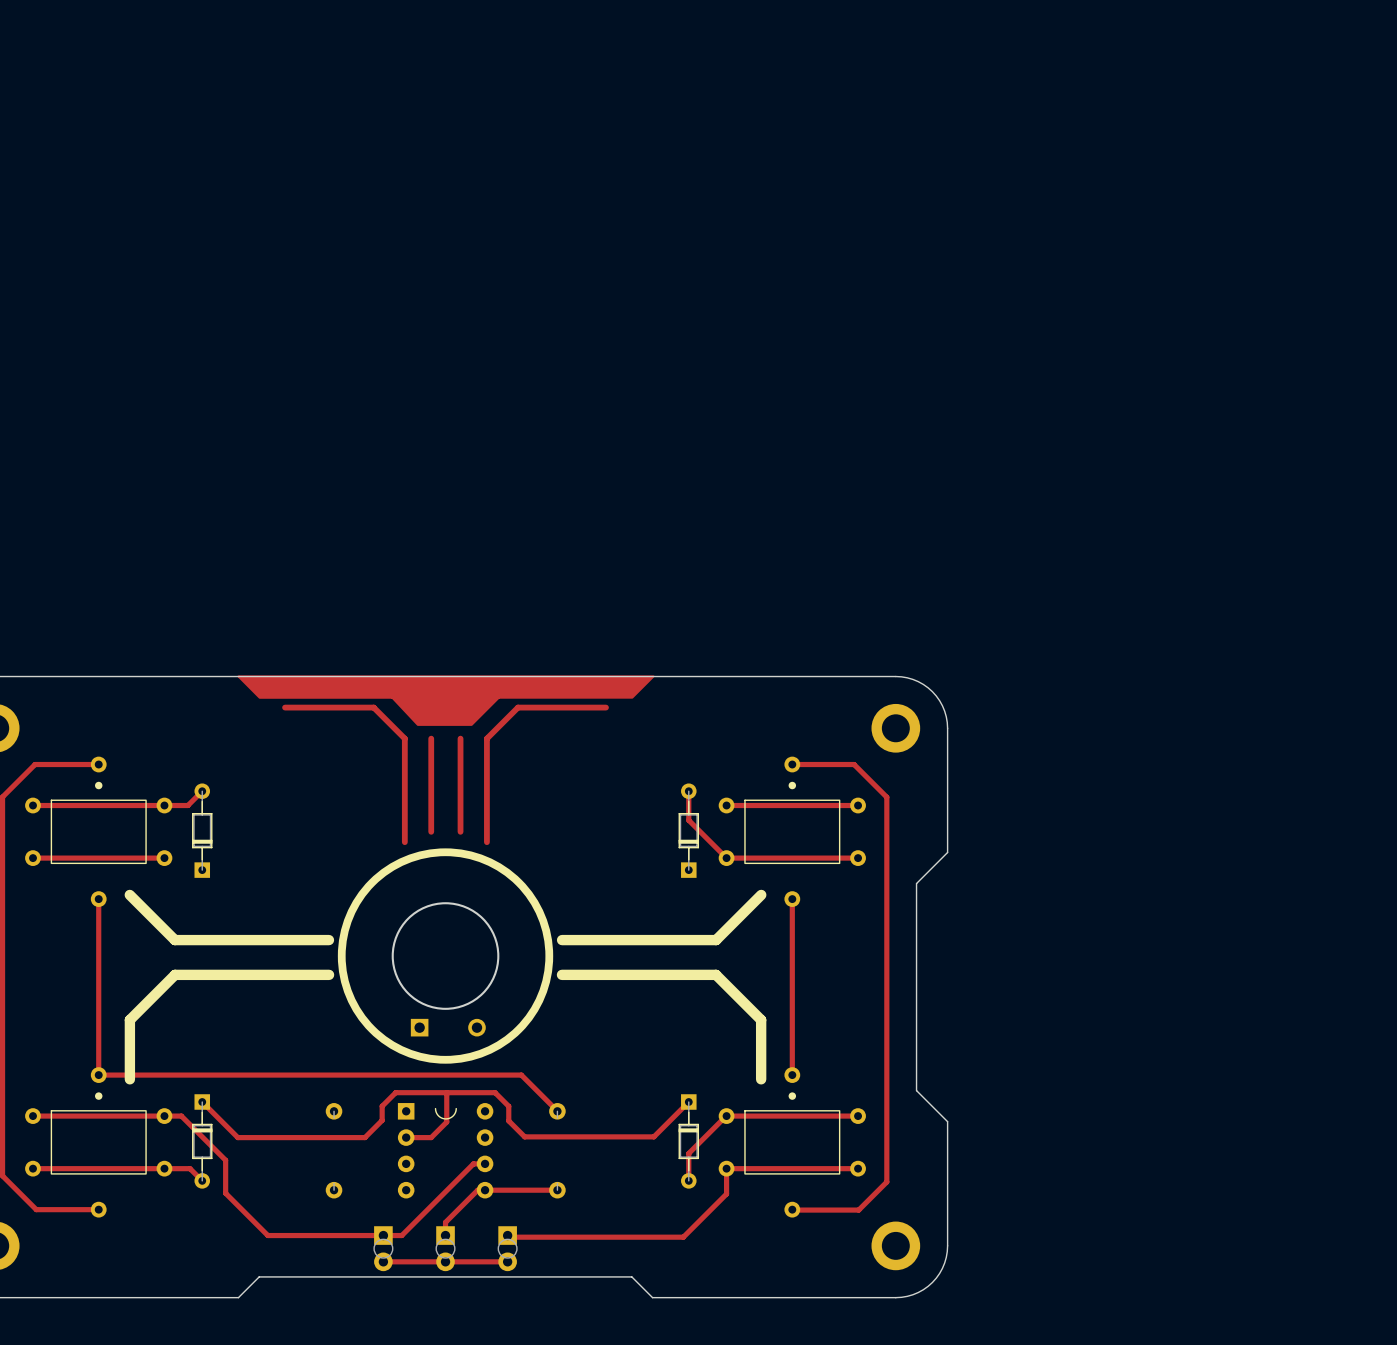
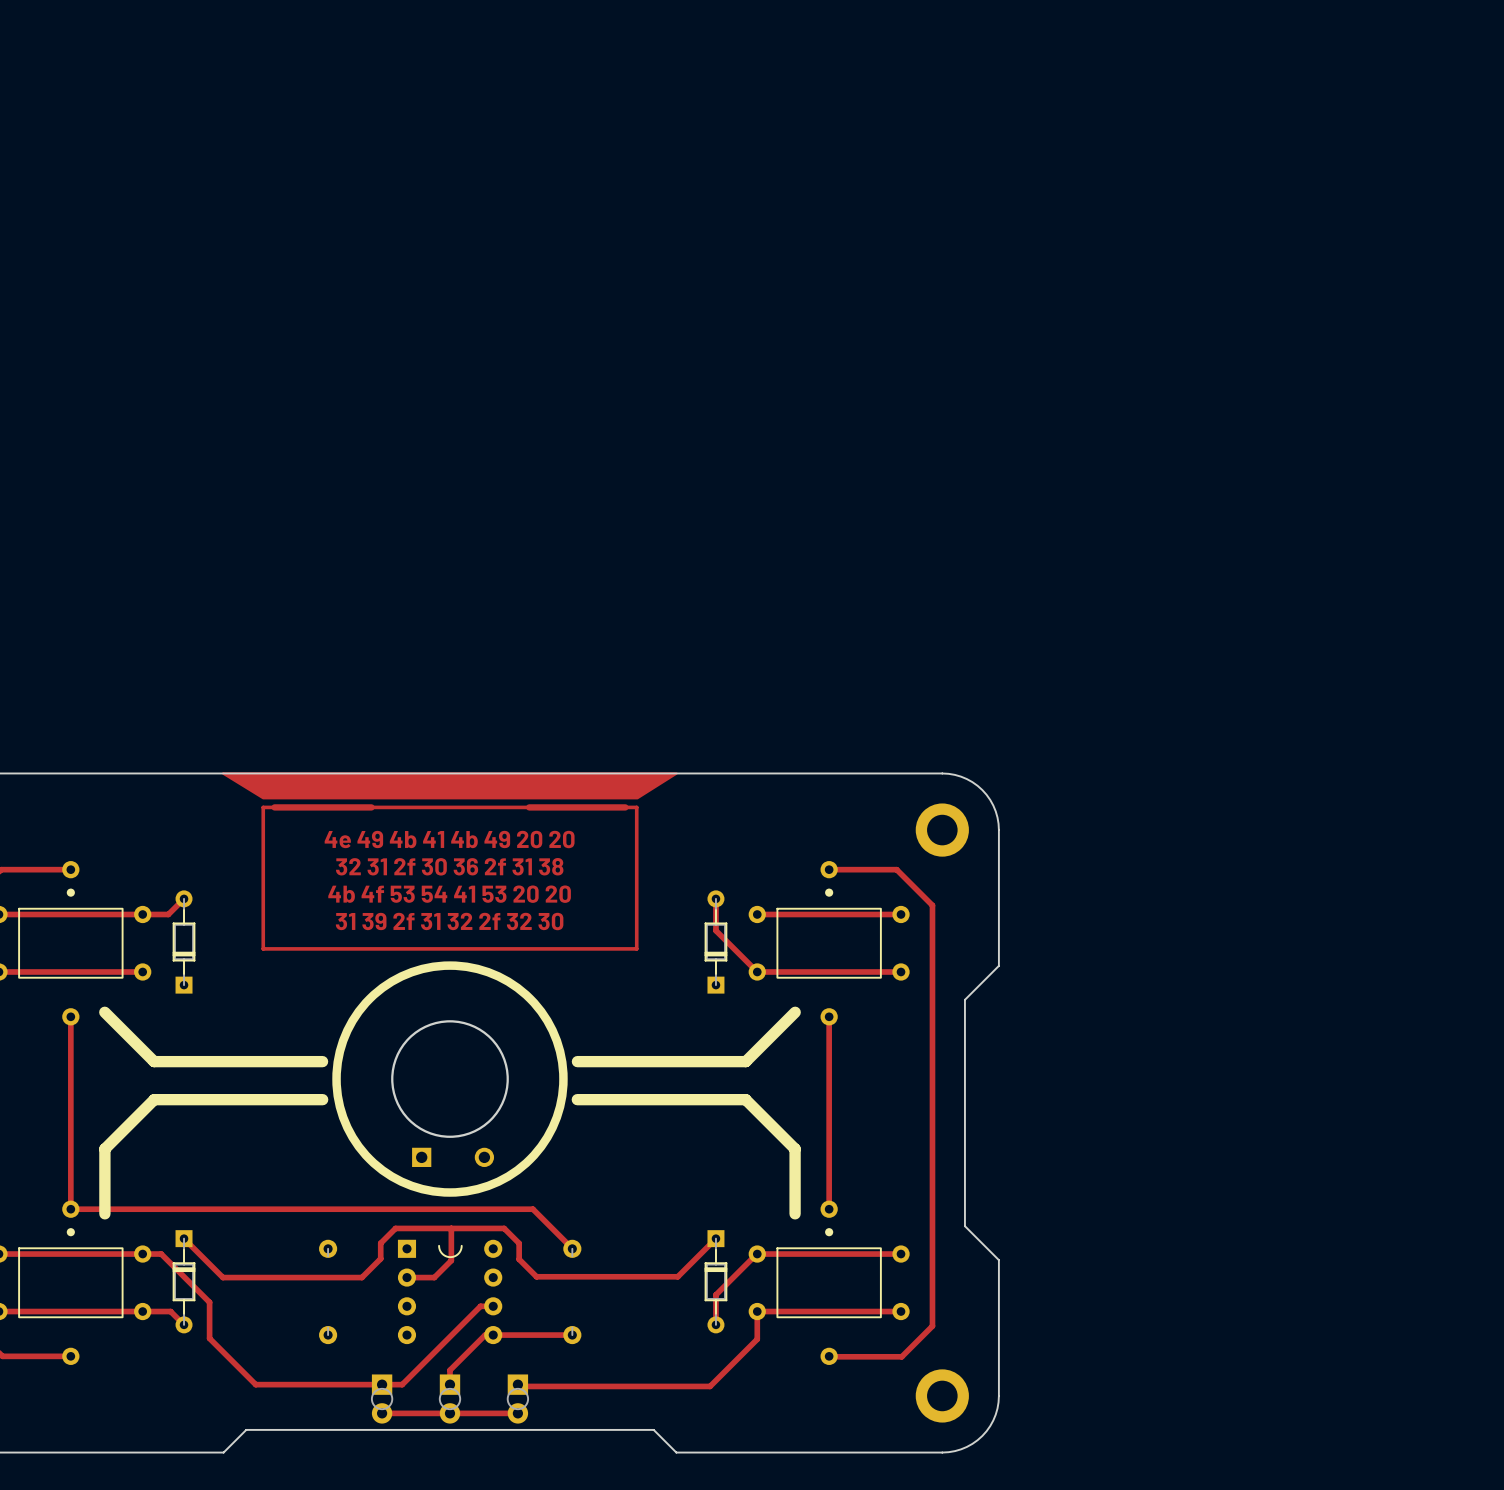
drawing shape: [237, 675, 655, 699] -> [221, 772, 678, 800]
drawing: [388, 693, 503, 726] -> none
track: none -> (274, 807) (263, 807) (263, 948) (636, 948) (636, 807) (625, 807)
track: (373, 707) (404, 738) (404, 842) -> (371, 807) (529, 807)
track: (517, 707) (486, 738) (486, 842) -> none
text: none -> 4e 49 4b 41 4b 49 20 20 (449, 839)
track: (431, 738) (431, 831) -> none
track: (460, 738) (460, 831) -> none
text: none -> 32 31 2f 30 36 2f 31 38 (449, 866)
text: none -> 4b 4f 53 54 41 53 20 20 (449, 894)
text: none -> 31 39 2f 31 32 2f 32 30 (449, 921)

